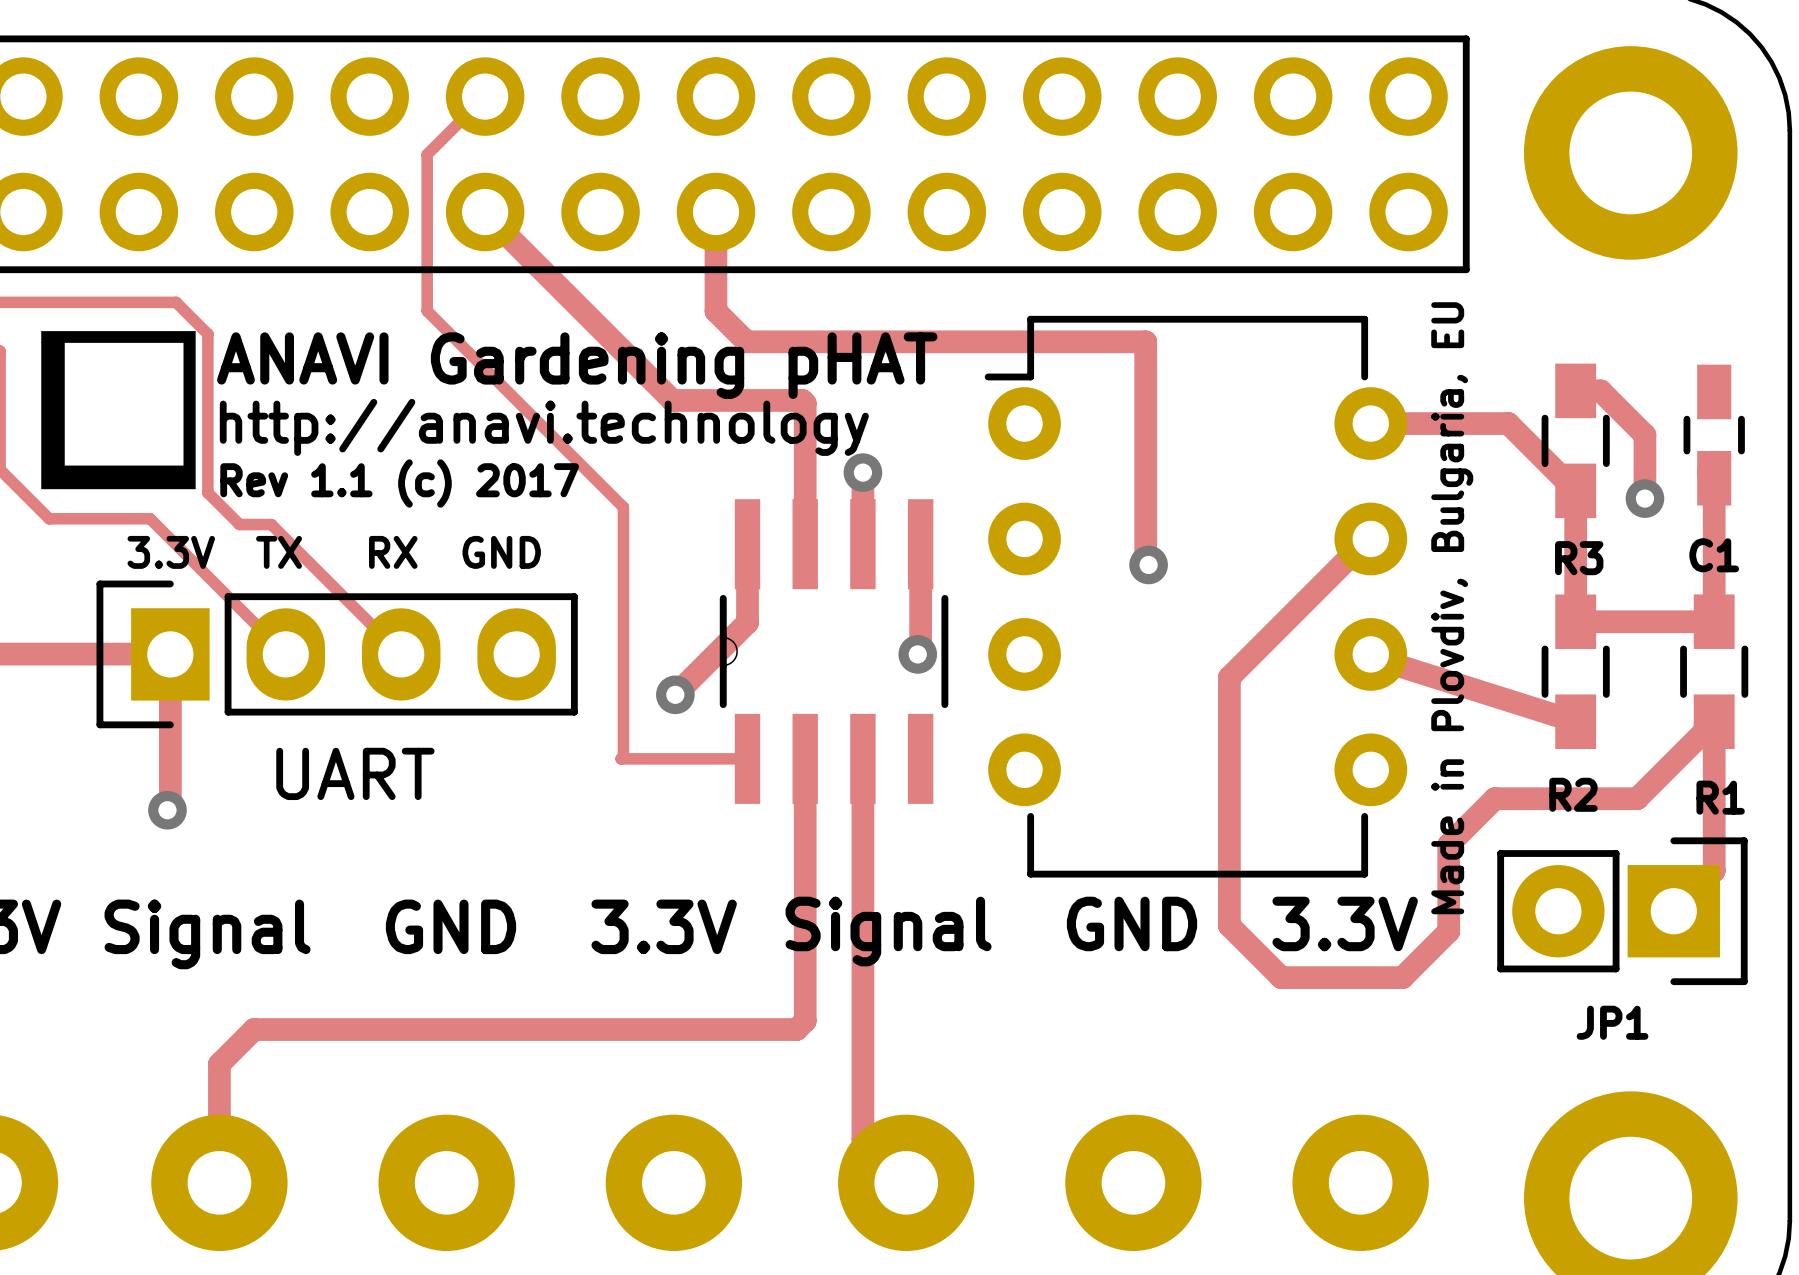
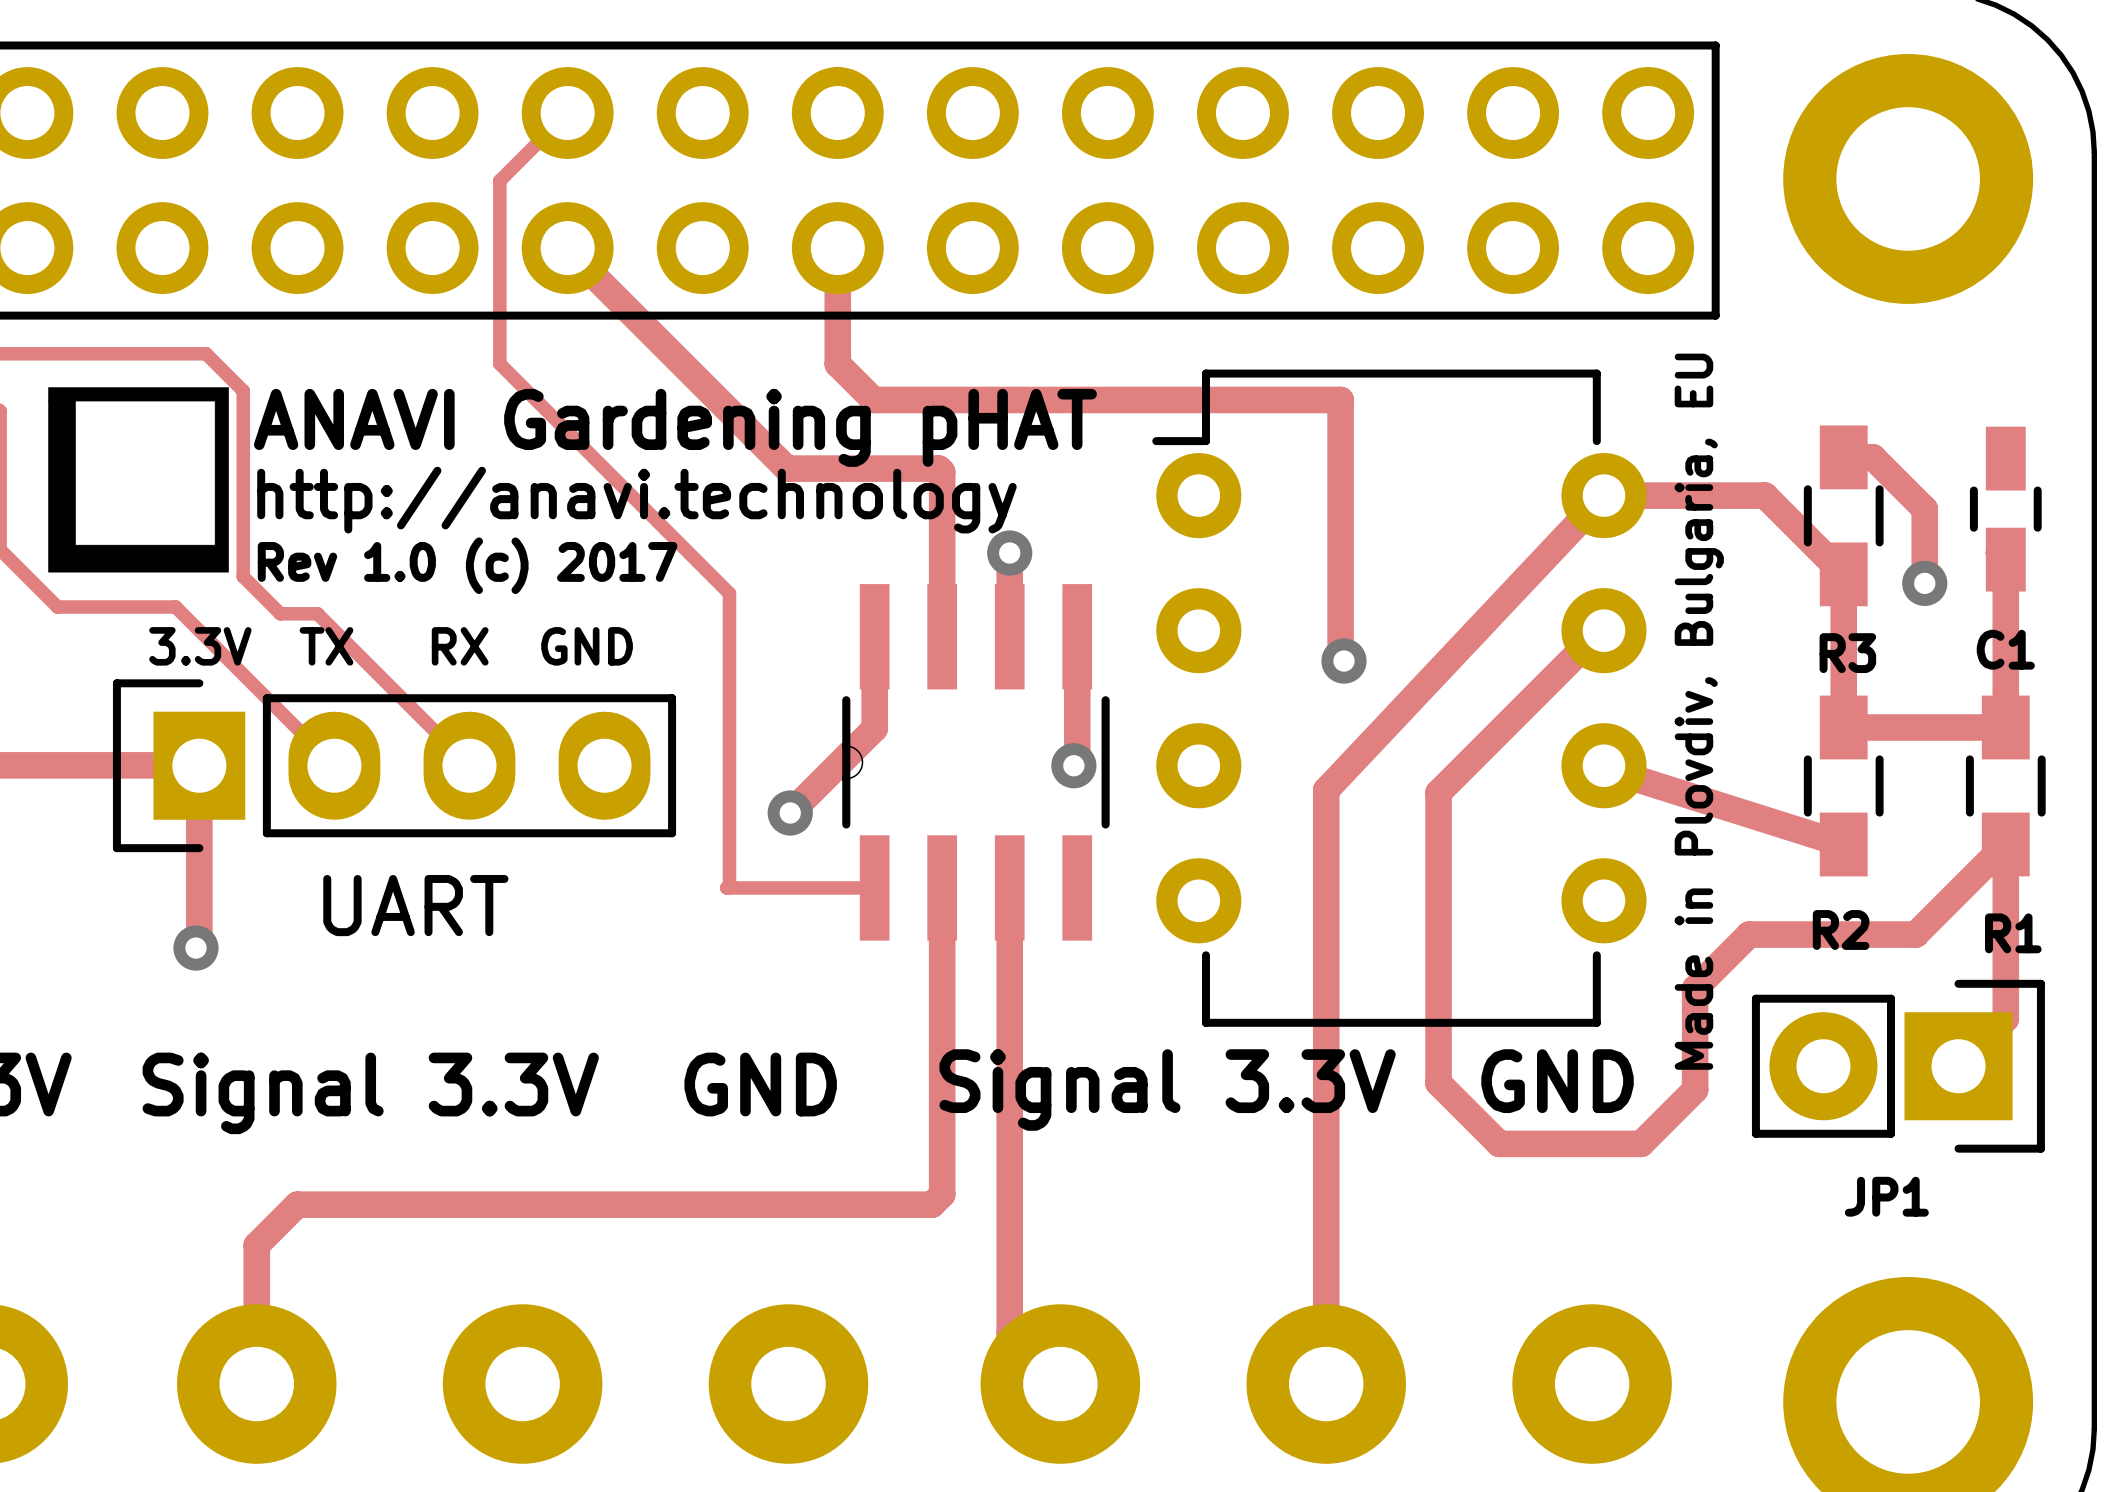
track: none -> (1603, 495) (1326, 790) (1326, 1384)
text: Rev 1.1 (c) 2017 (399, 483) -> Rev 1.0 (c) 2017 (467, 565)
text: Signal GND 3.3V (1101, 931) -> Signal 3.3V GND (1286, 1090)
text: Signal GND 3.3V (420, 934) -> Signal 3.3V GND (489, 1093)

